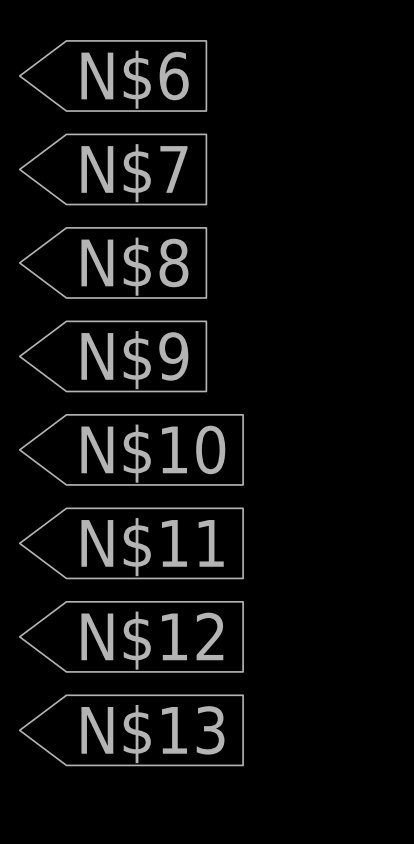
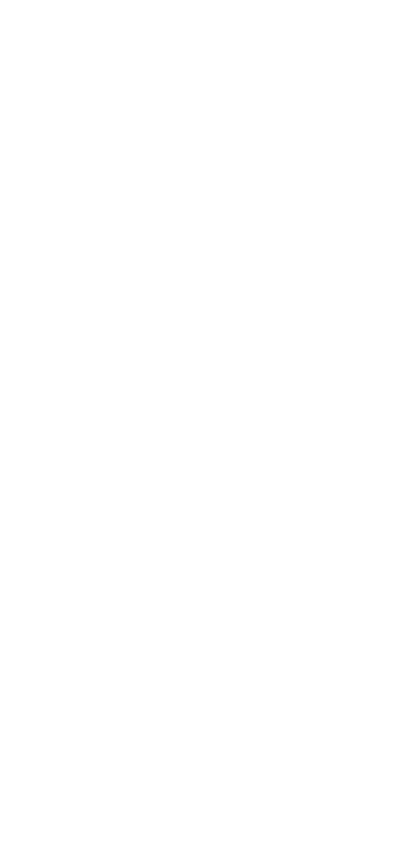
global label: N$6 (135, 79) -> none
global label: N$7 (134, 173) -> none
global label: N$8 (134, 266) -> none
global label: N$9 (134, 360) -> none
global label: N$10 (153, 453) -> none
global label: N$11 (152, 547) -> none
global label: N$12 (152, 640) -> none
global label: N$13 (152, 734) -> none

